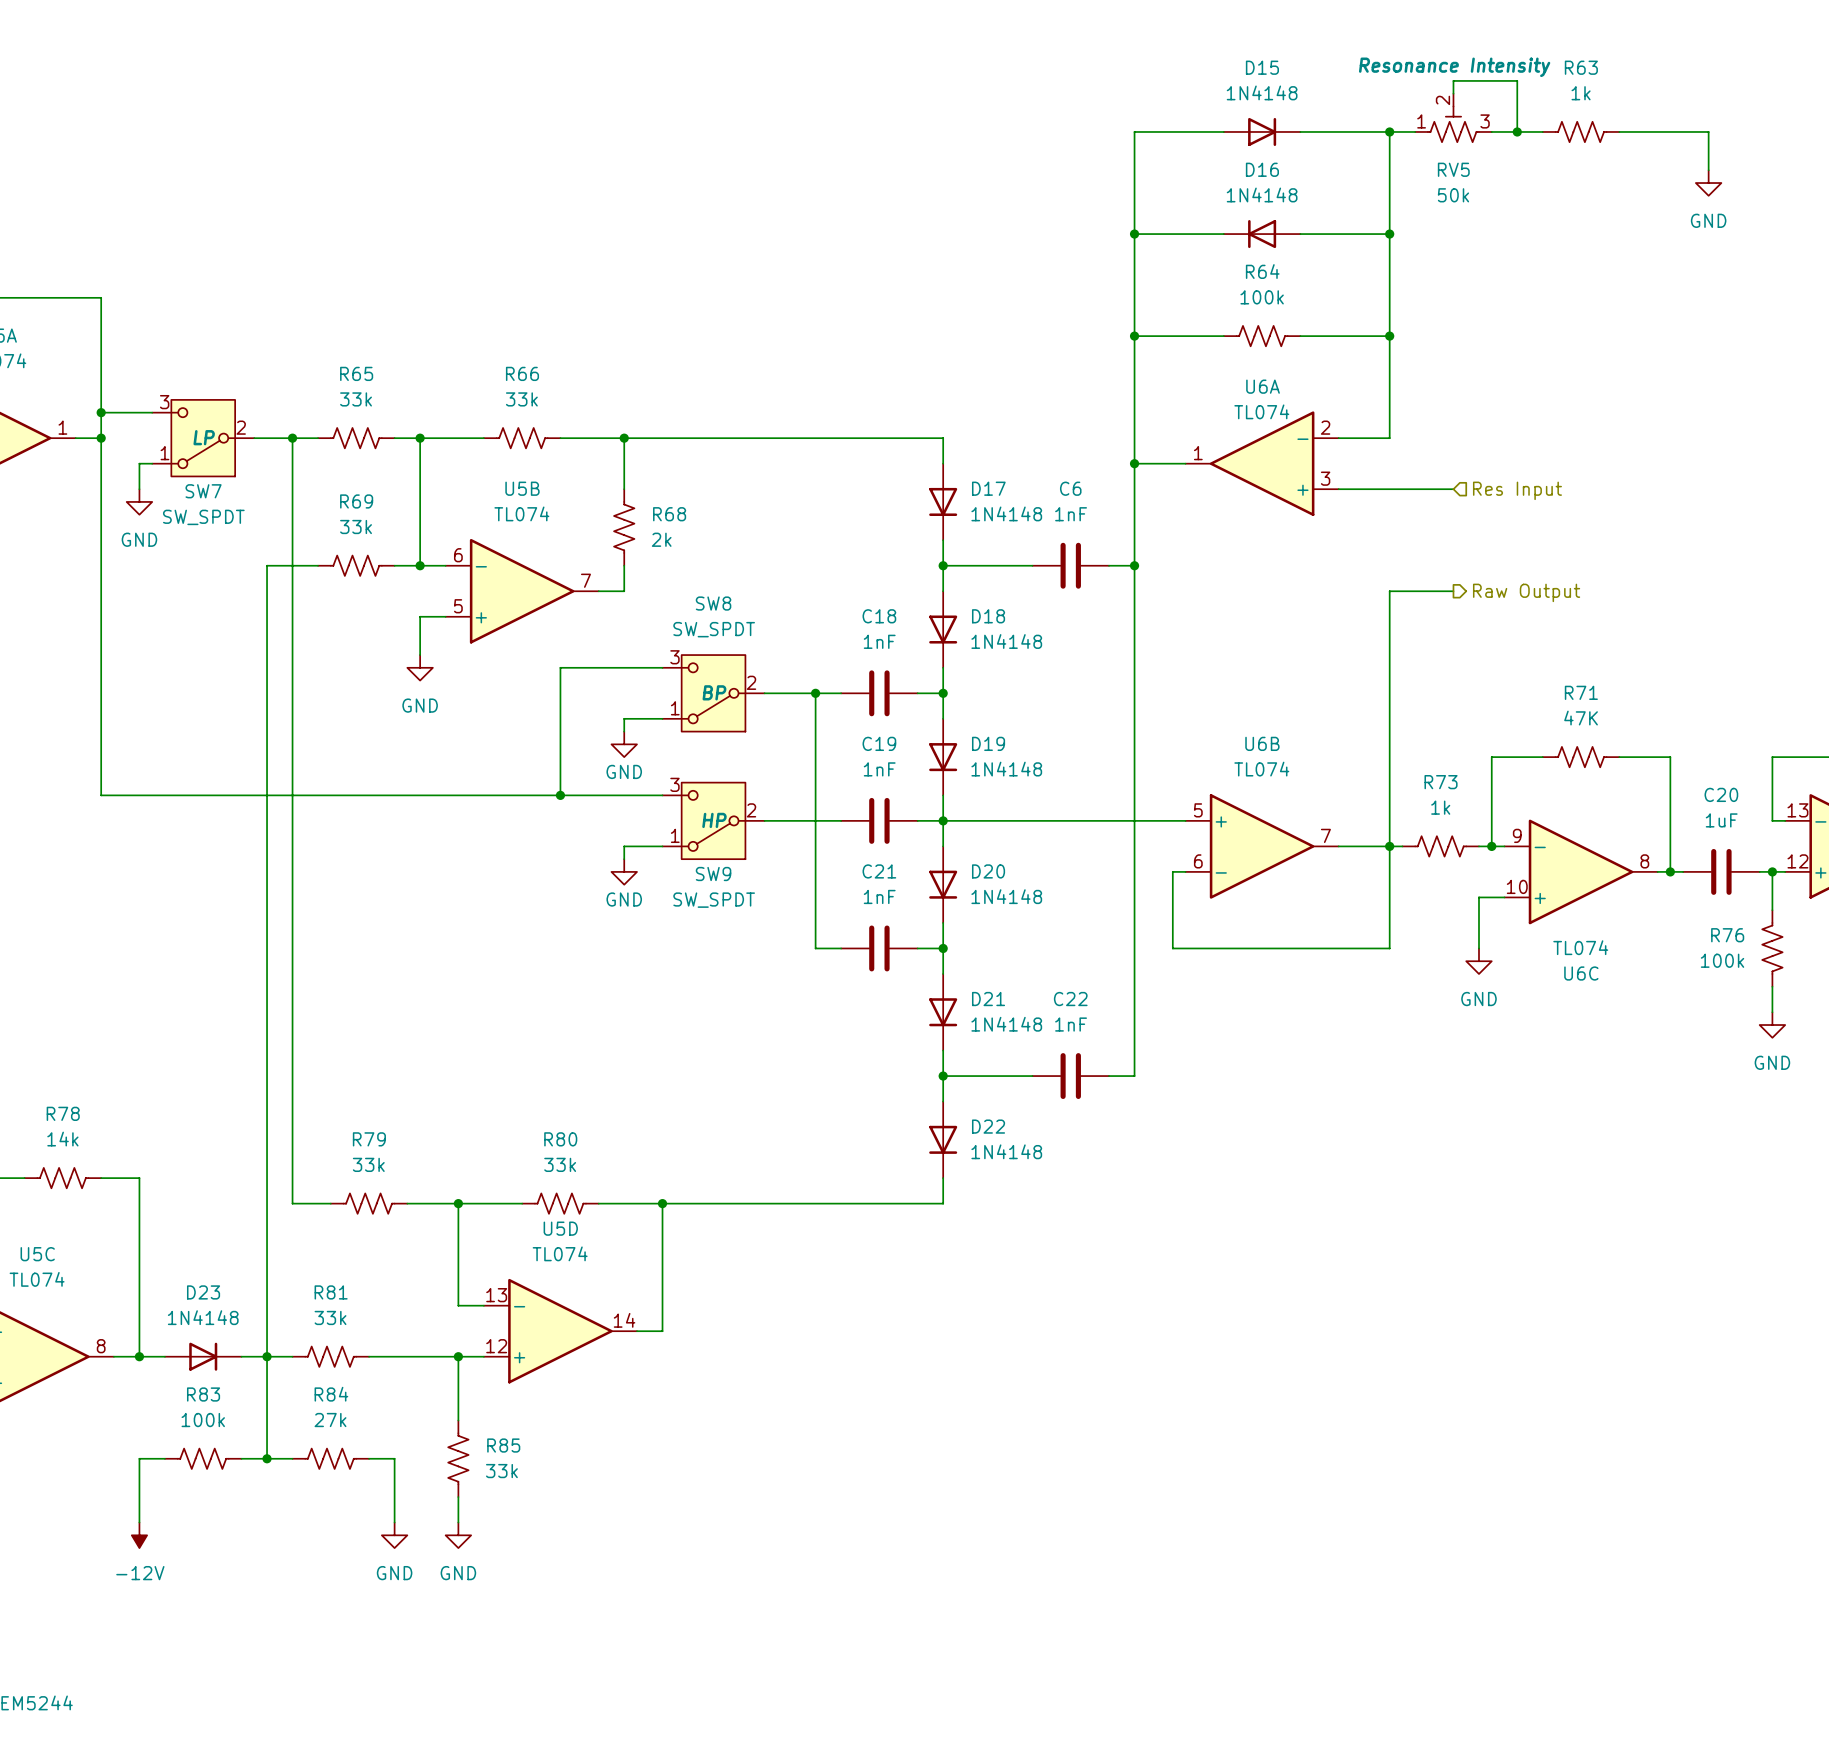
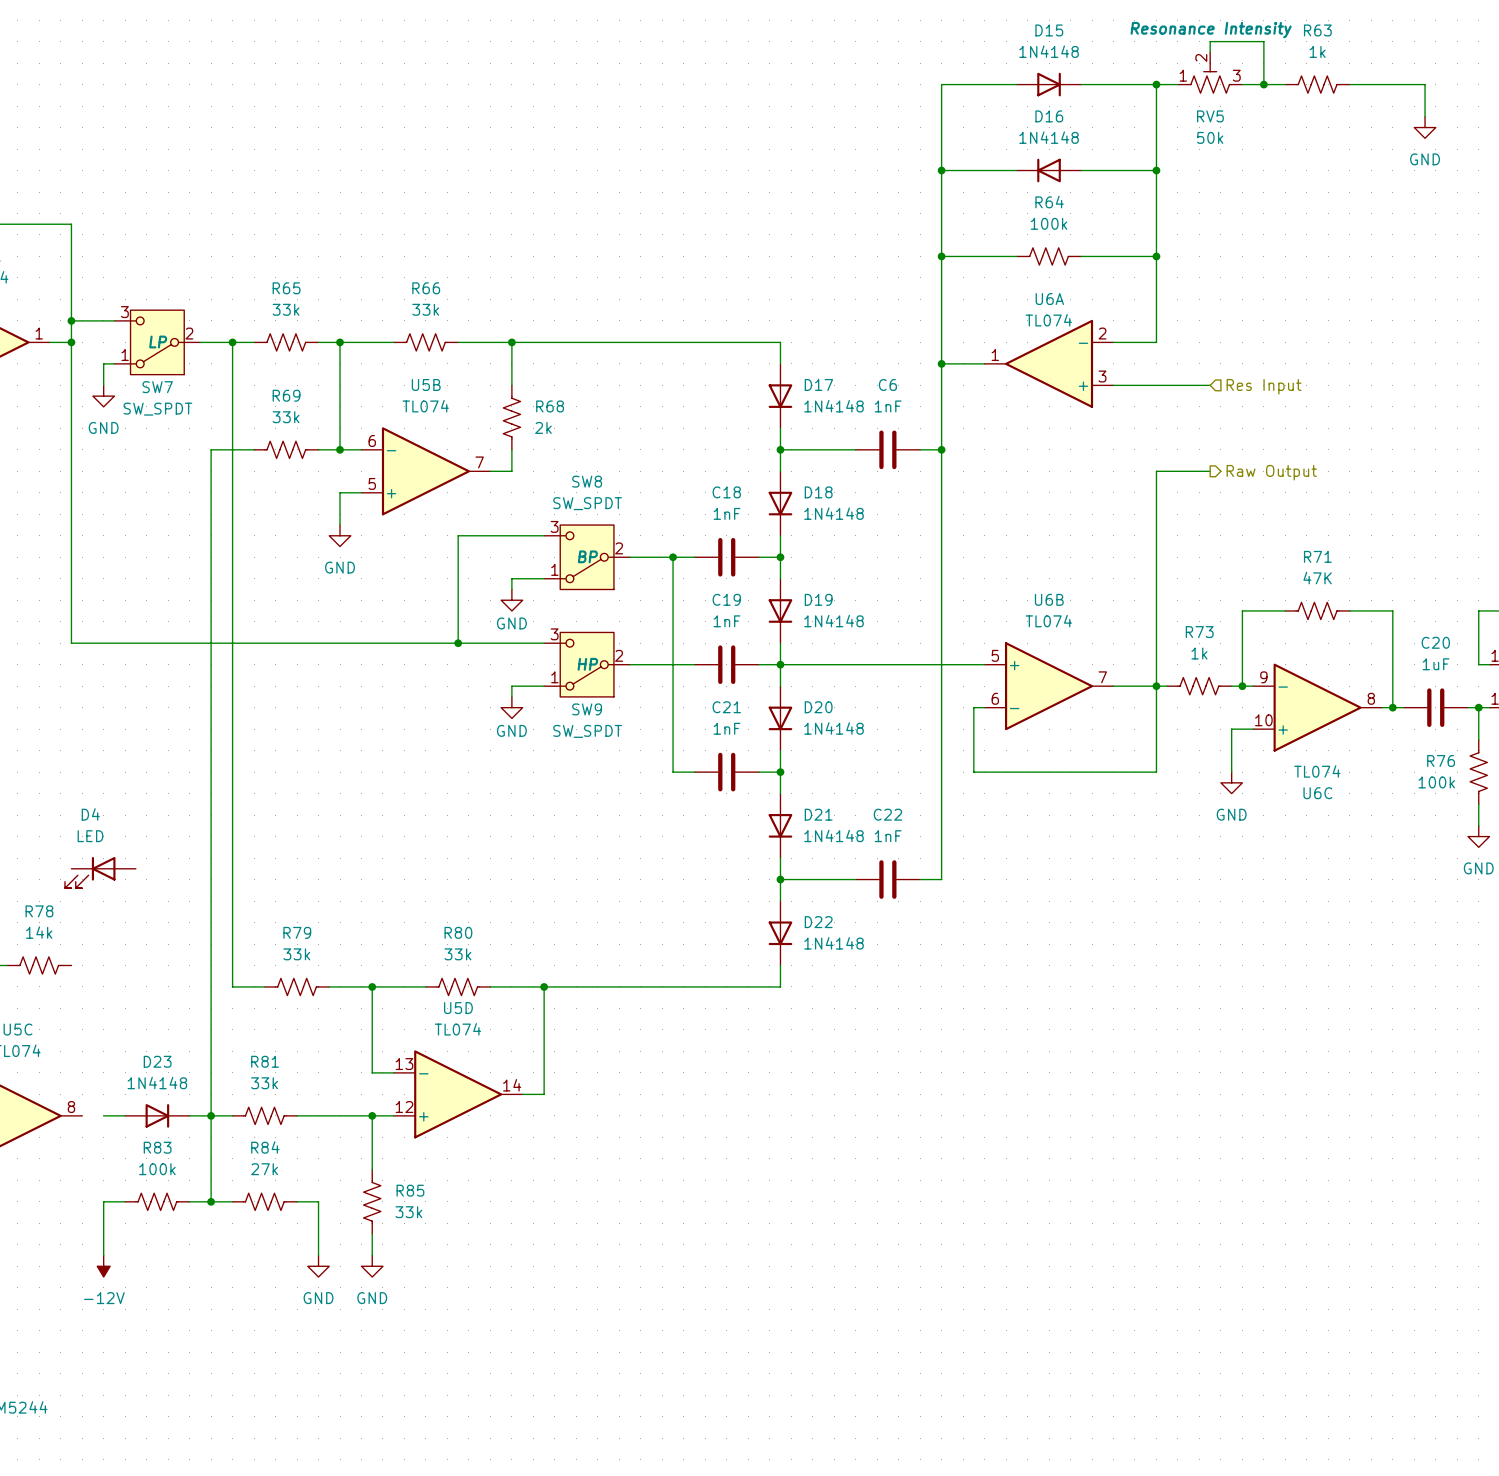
D4: none -> LED (100, 872)
wire: (101, 1178) (139, 1178) (139, 1356) (113, 1356) -> none
junction: (139, 1356) -> none

